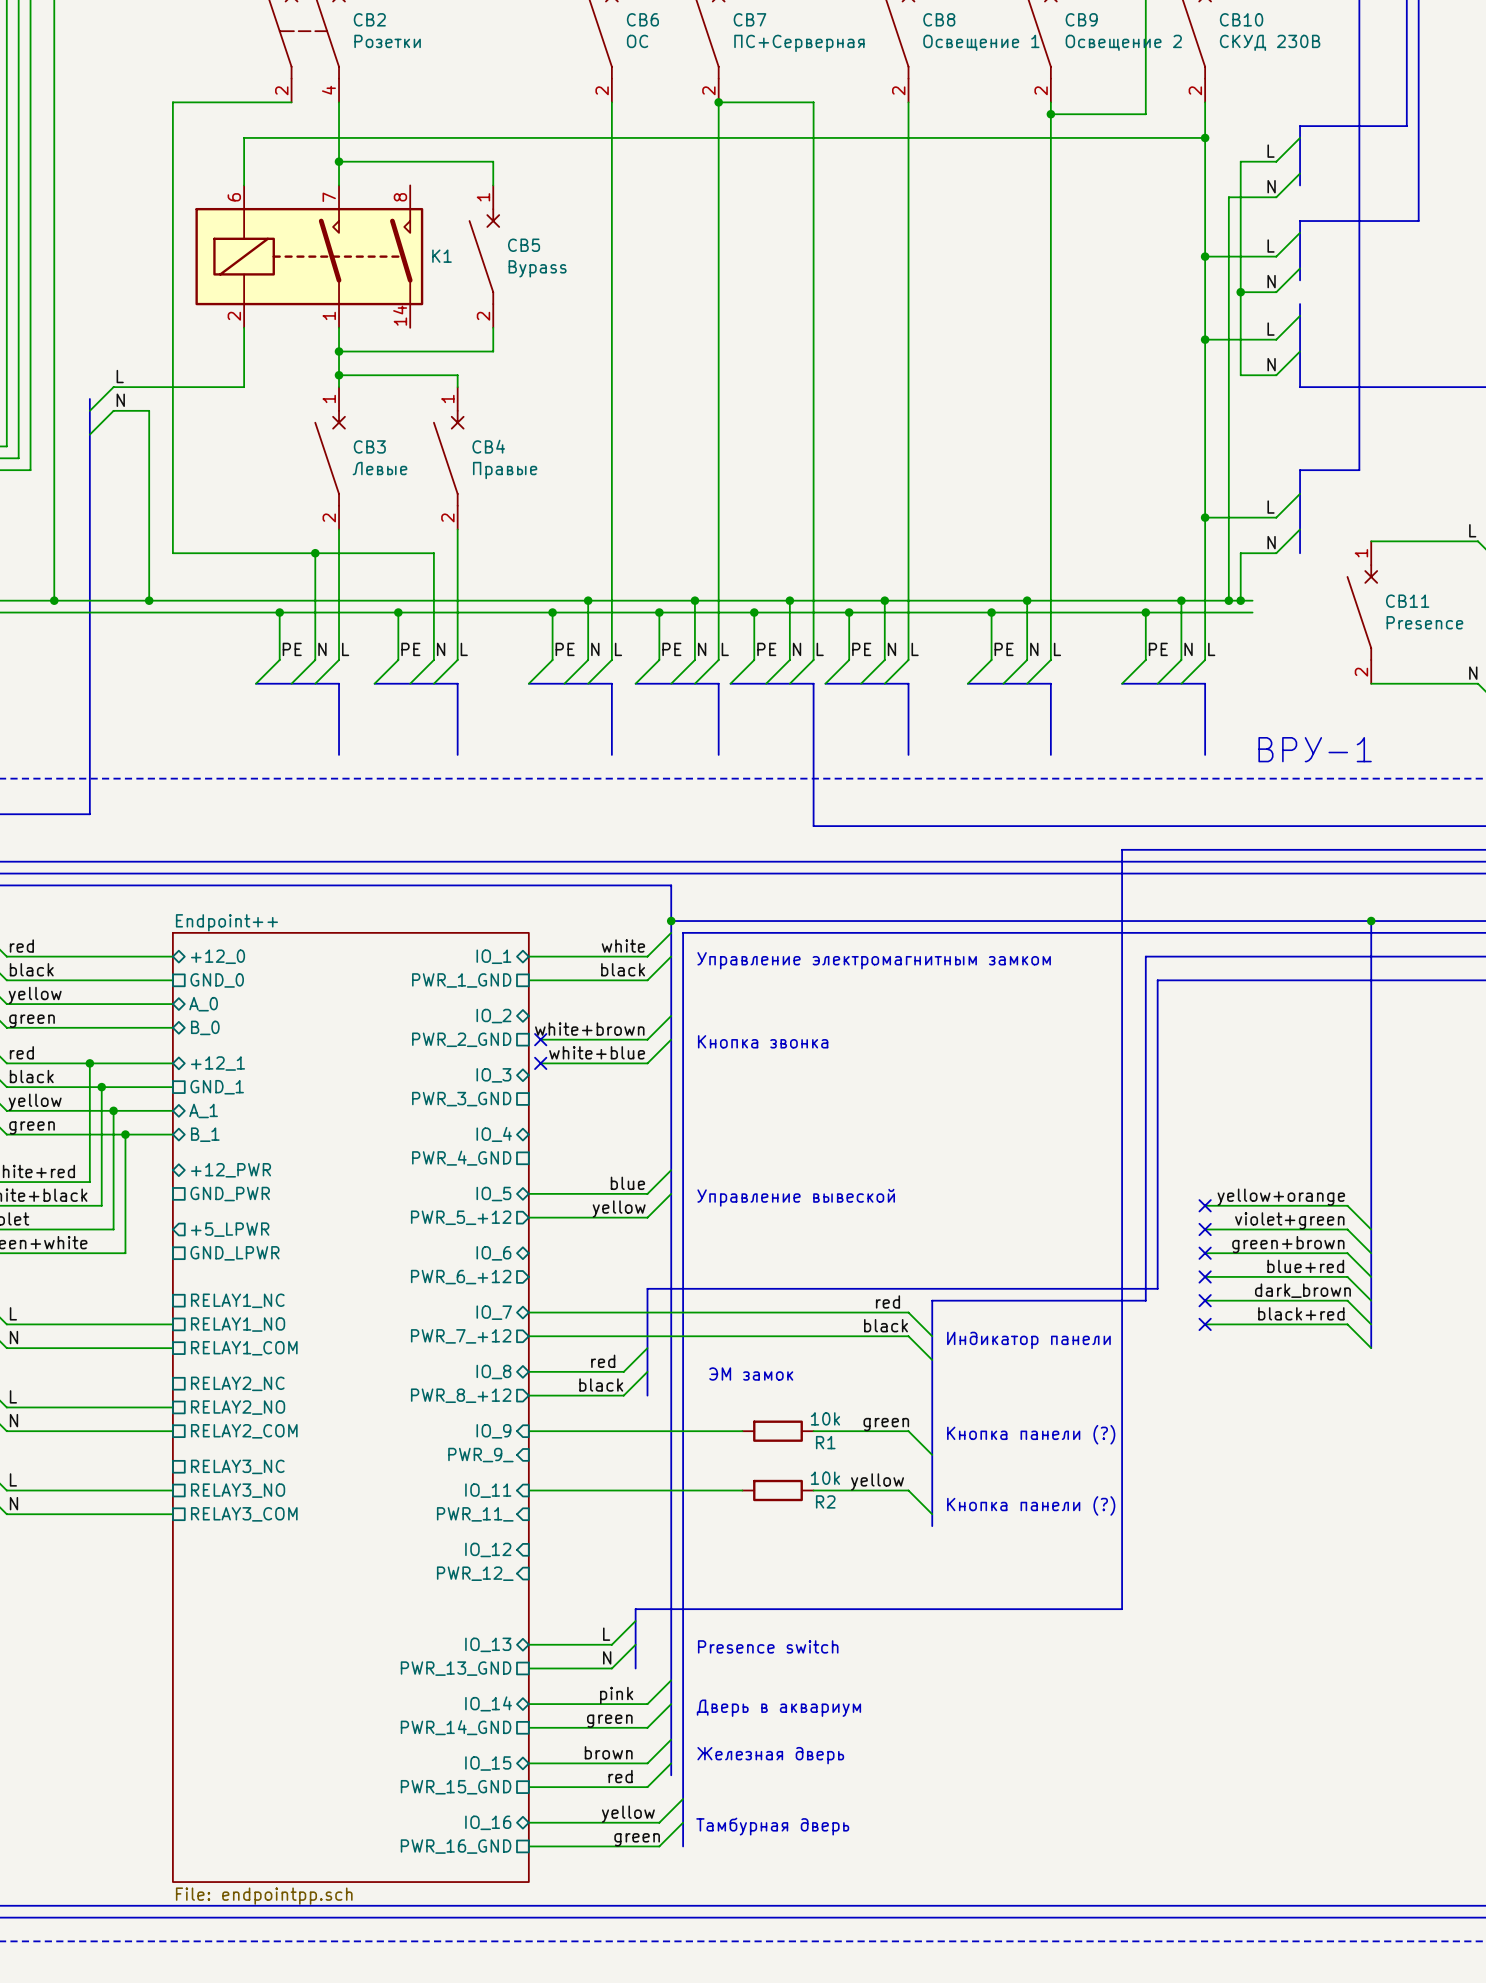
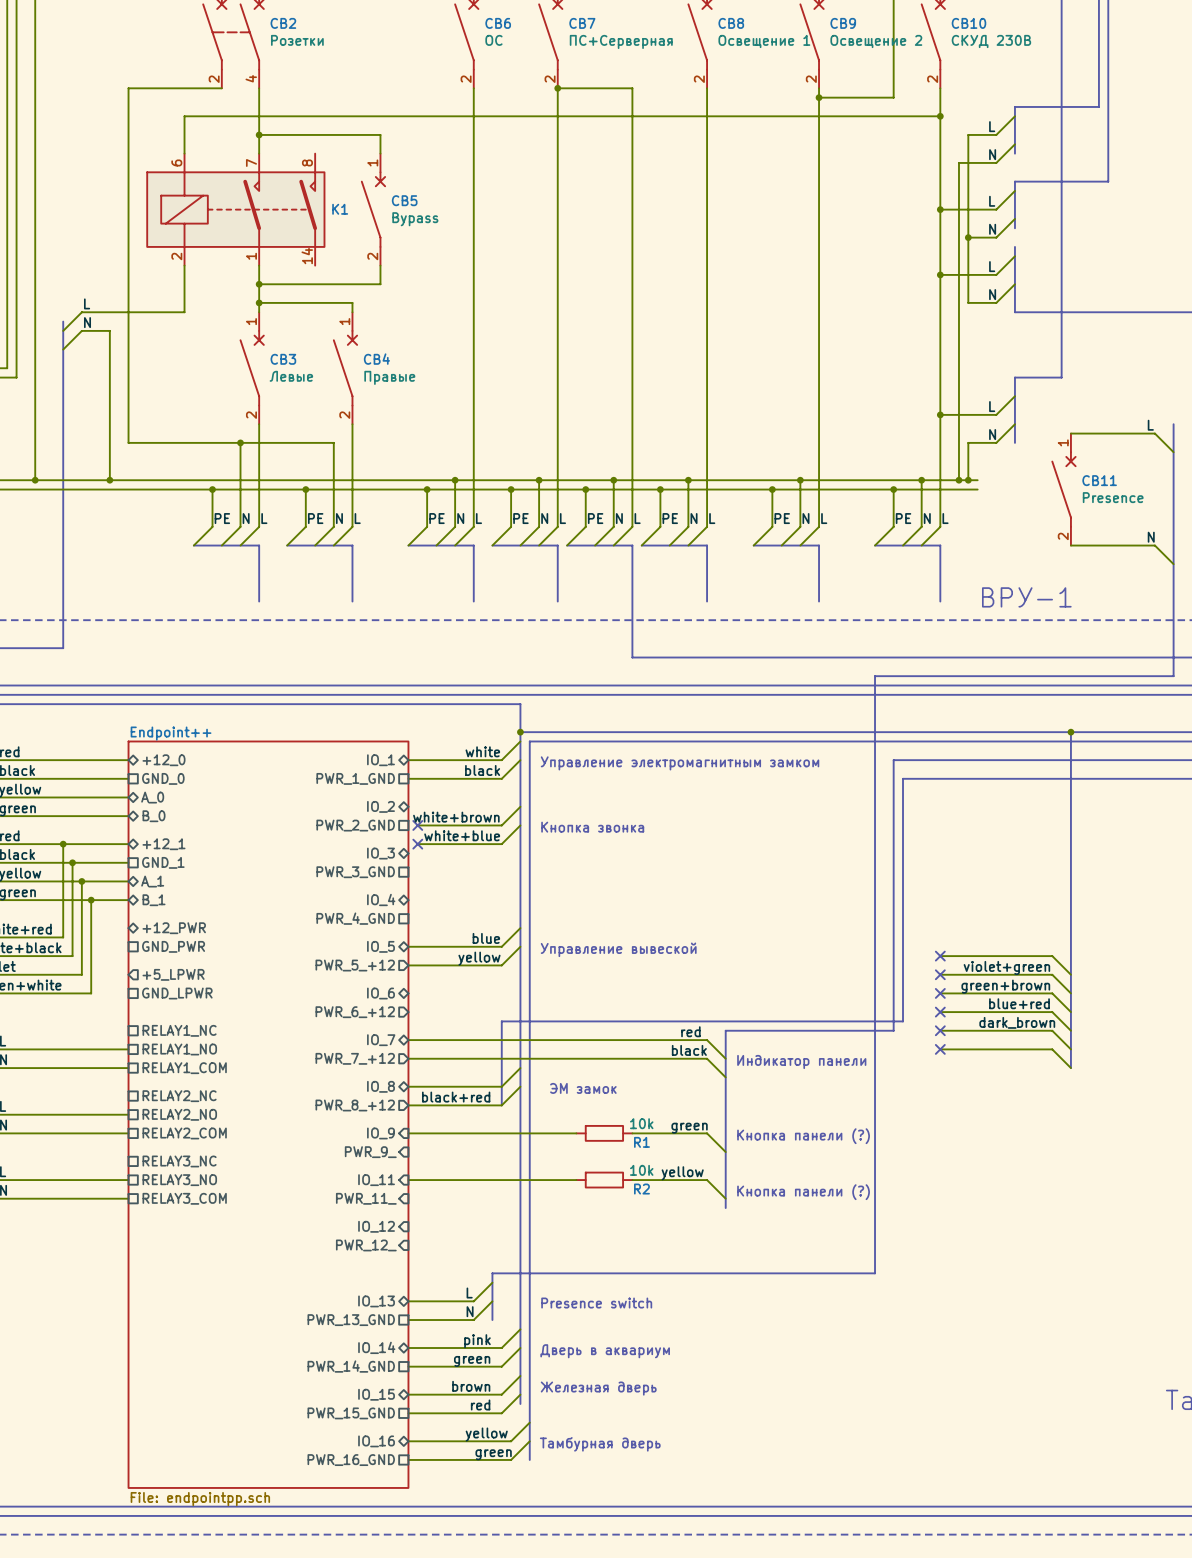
label: yellow+orange (1281, 1197) -> none
label: black+red (1301, 1313) -> none
wire: (647, 1348) (623, 1371) -> (520, 1068) (501, 1086) (483, 1086)
label: red (603, 1361) -> none
wire: (647, 1371) (623, 1395) -> (520, 1086) (501, 1105) (483, 1105)
label: black (601, 1385) -> black+red (456, 1097)

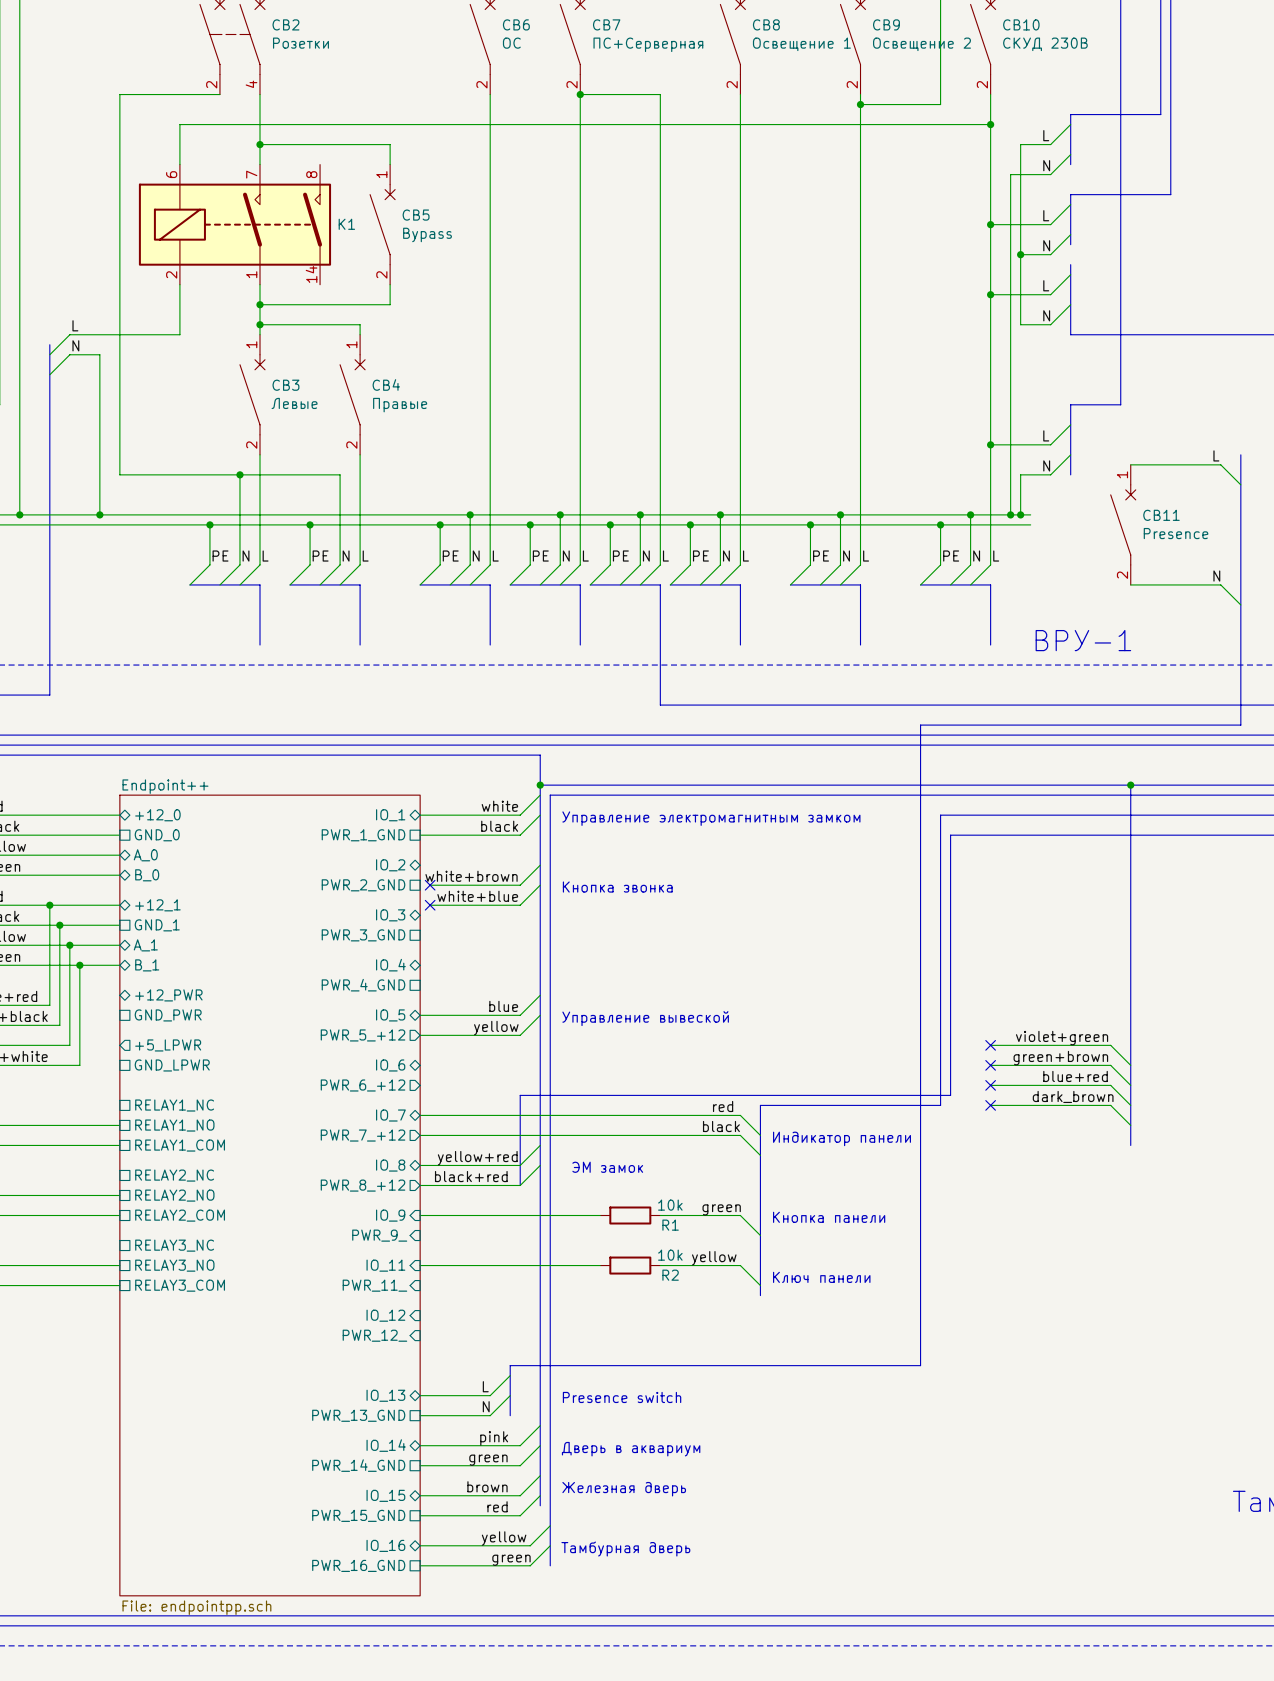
wire: (940, 956) (1052, 956) (1070, 974) -> none
no-connect mark: (940, 956) -> none
wire: (940, 1049) (1052, 1049) (1070, 1068) -> none
no-connect mark: (940, 1049) -> none
label: none -> yellow+red (477, 1158)
text: Кнопка панели (?) (803, 1136) -> Кнопка панели (829, 1217)
text: Кнопка панели (?) (803, 1192) -> Ключ панели (821, 1277)

